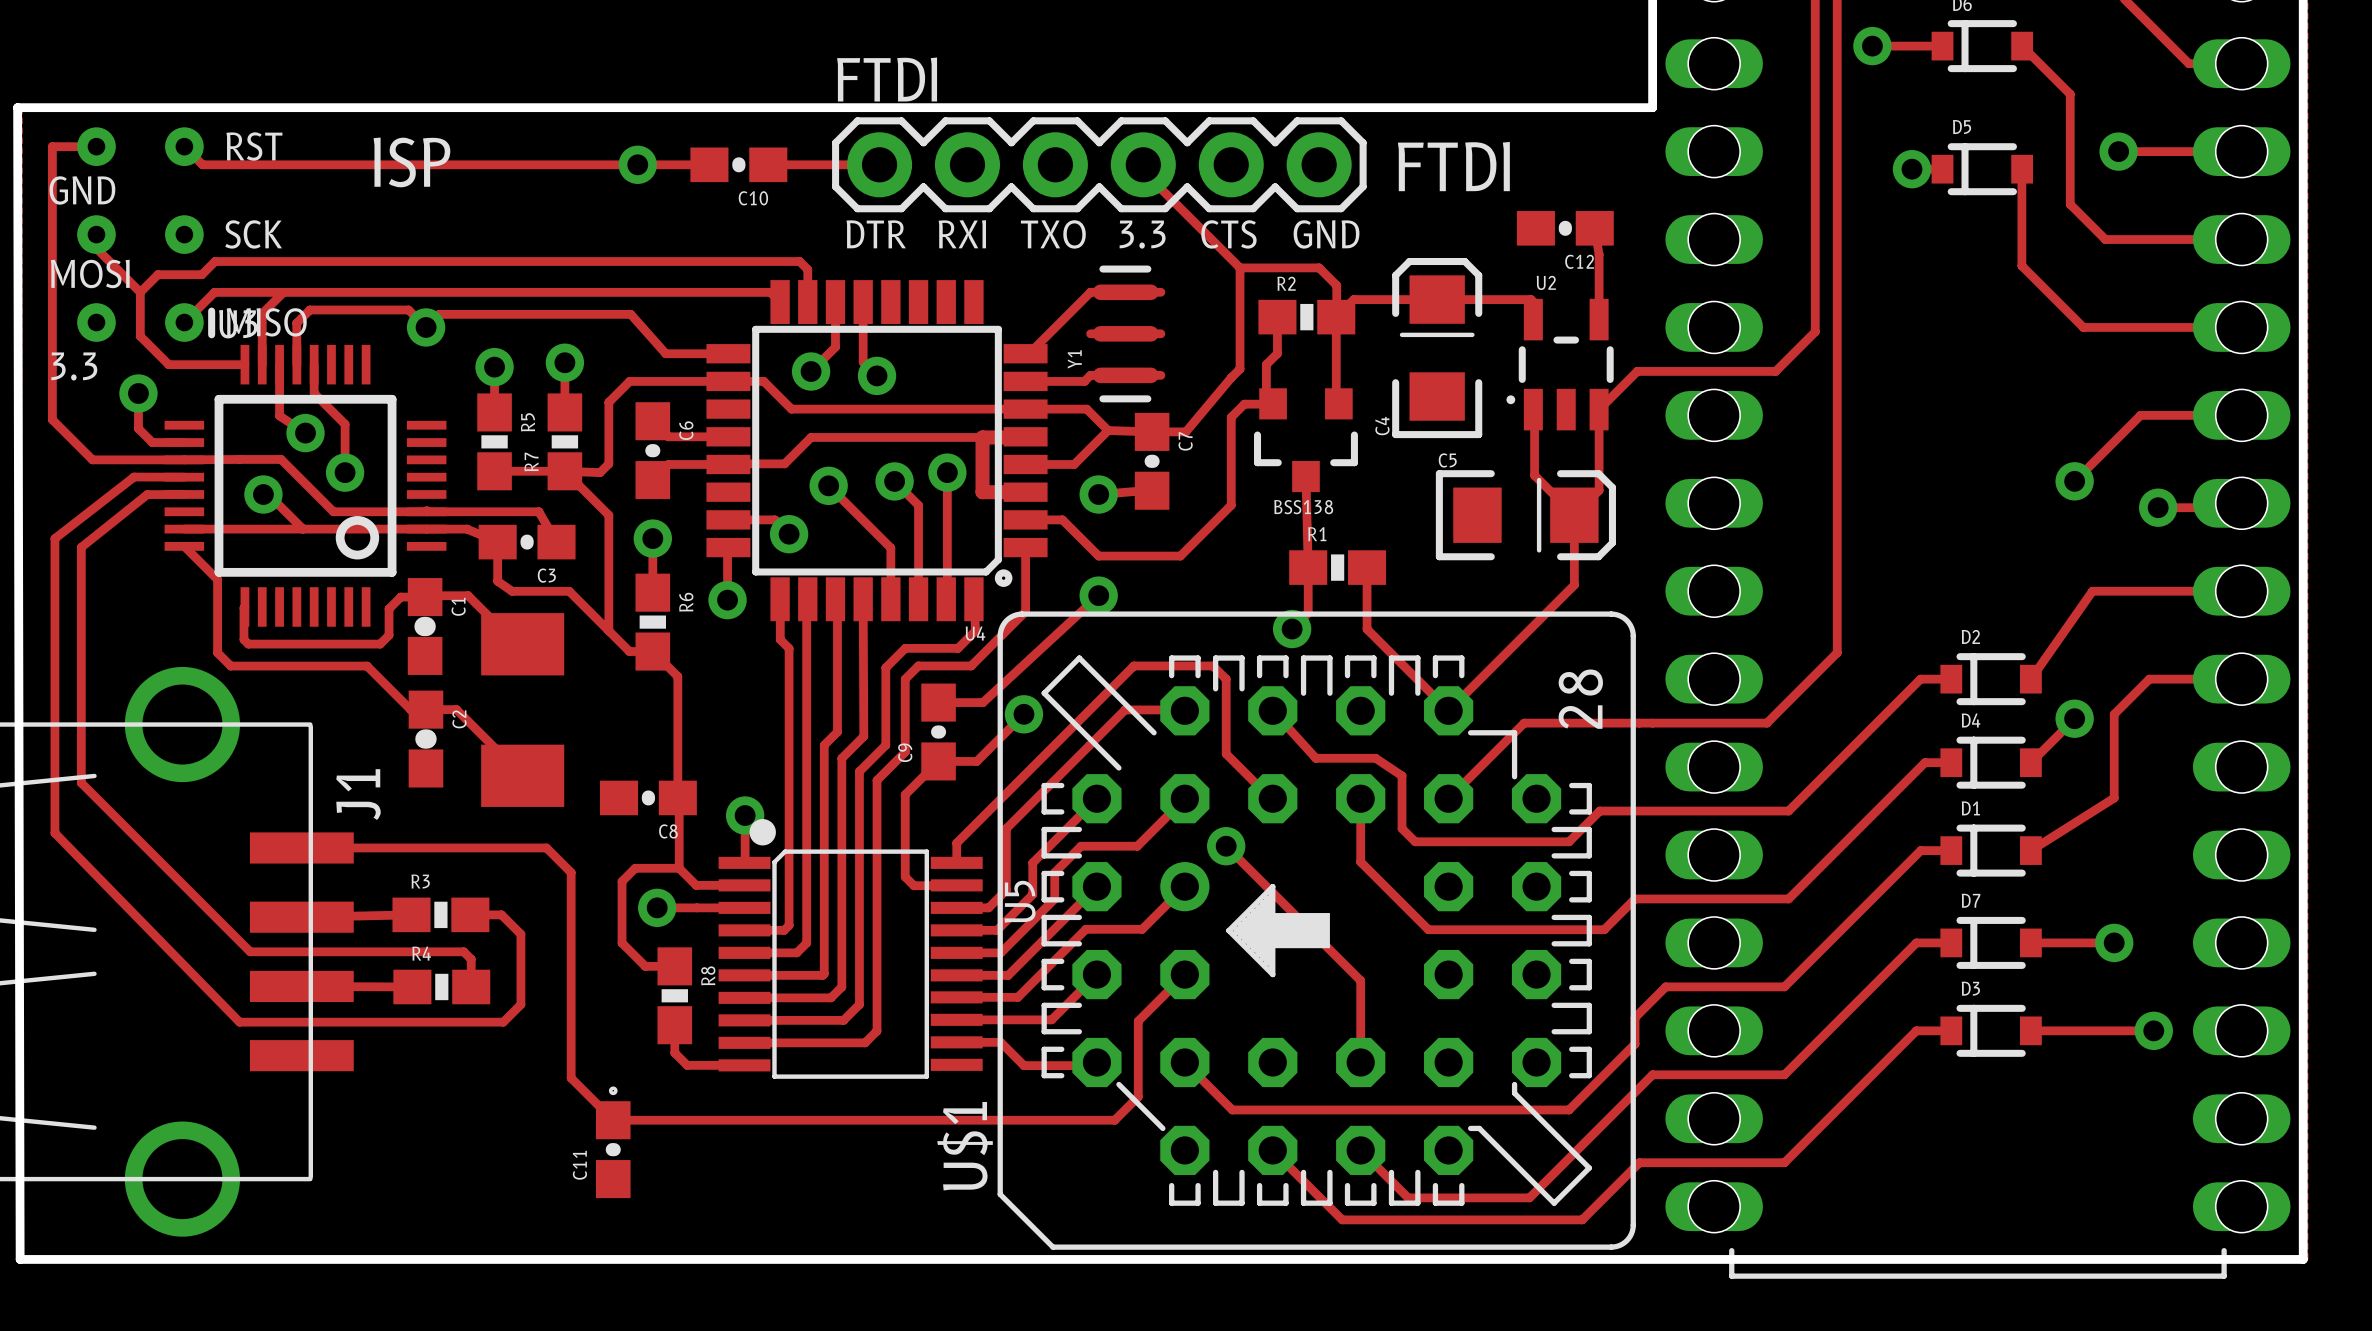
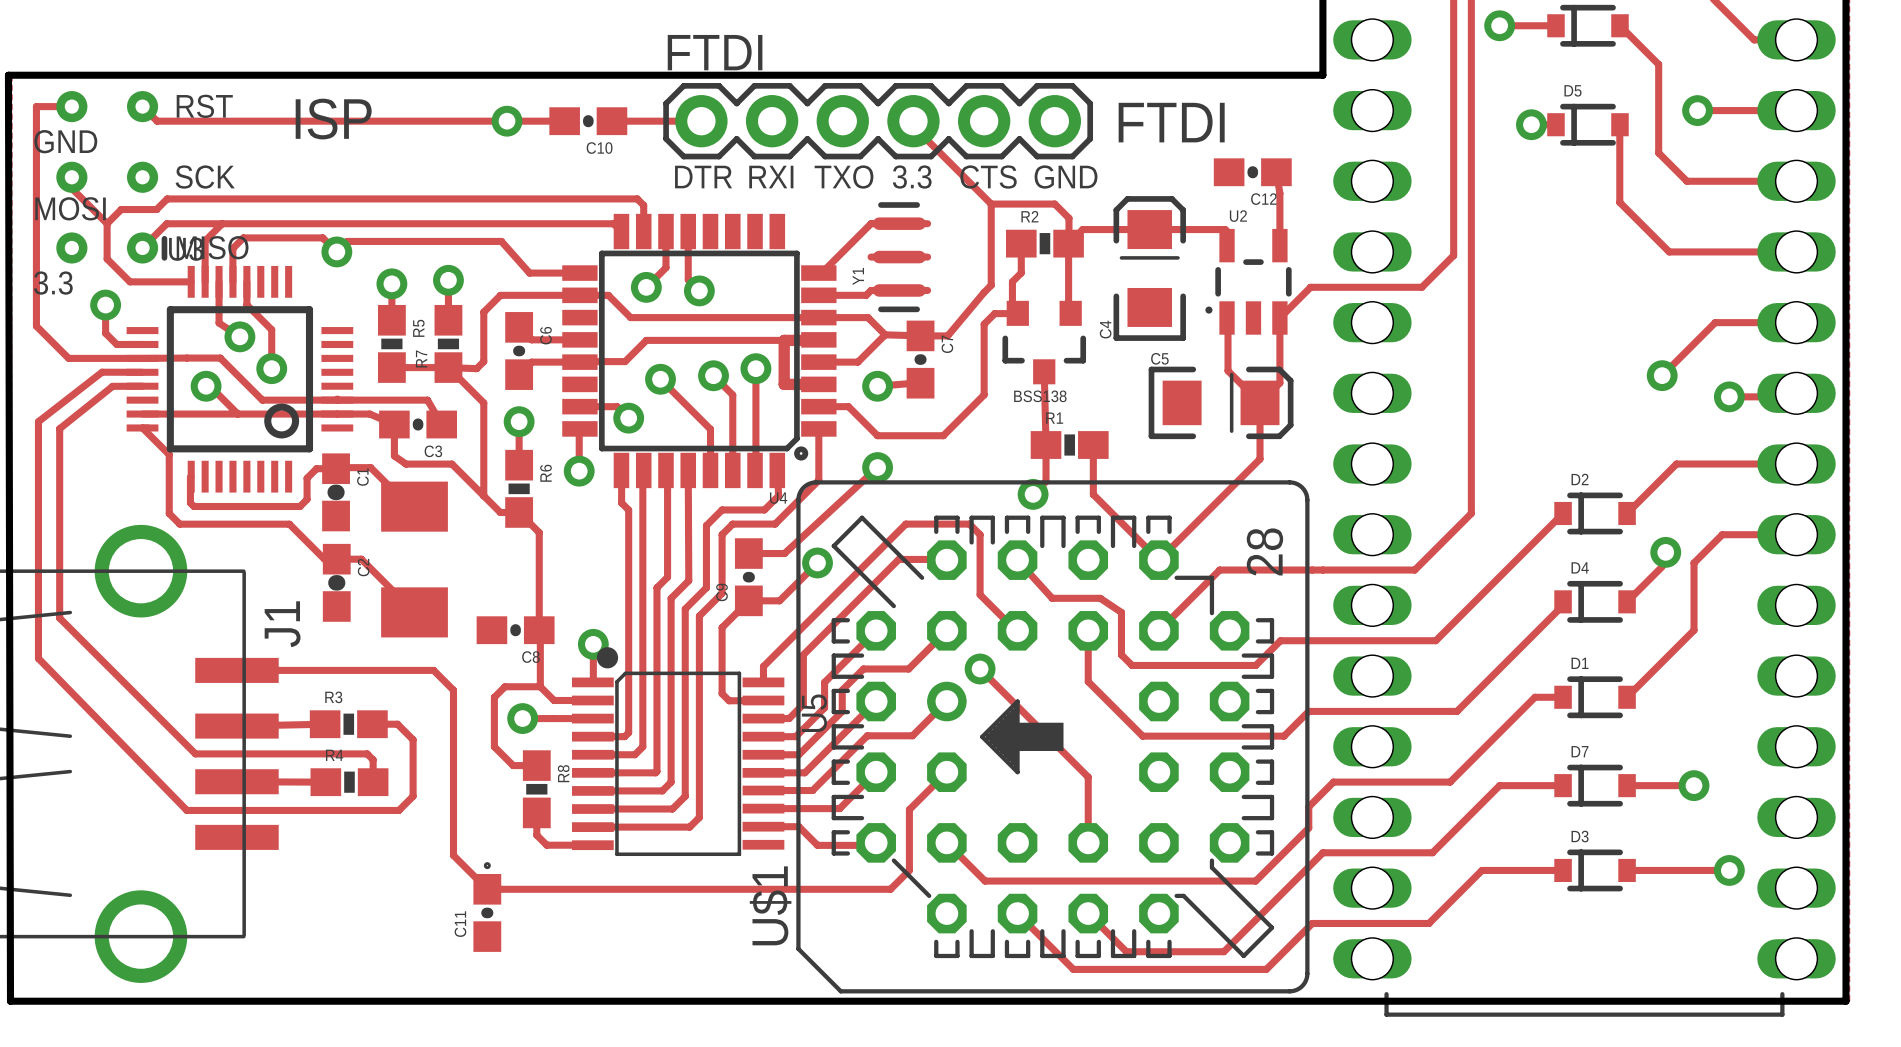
track: (2092, 591) (2030, 679) -> (1676, 464) (1627, 513)
track: (1951, 679) (1920, 679) (1788, 811) -> (1563, 513) (1435, 640) (1432, 640)
D2 position: (1991, 679) -> (1595, 513)
via position: (2074, 718) -> (1665, 552)
track: (1951, 762) (1924, 762) (1788, 898) -> (1563, 605) (1457, 711) (1432, 711)
track: (2114, 798) (2030, 850) -> (1694, 630) (1627, 697)
track: (1951, 850) (1920, 850) (1784, 986) -> (1563, 697) (1534, 697) (1450, 782) (1428, 782)
D1 position: (1991, 850) -> (1595, 697)
track: (1951, 942) (1916, 942) (1784, 1074) -> (1563, 785) (1499, 785) (1432, 852) (1428, 852)
D7 position: (1991, 942) -> (1595, 785)
track: (2030, 942) (2114, 942) -> (1627, 785) (1694, 785)
via: (2114, 942) -> none
via: none -> (1694, 785)
track: (1951, 1030) (1916, 1030) (1850, 1096) -> (1563, 870) (1481, 870)
D3 position: (1991, 1030) -> (1595, 870)
track: (2030, 1030) (2153, 1030) -> none
via: (2153, 1030) -> none
track: none -> (1627, 870) (1729, 870)
via: none -> (1729, 870)

